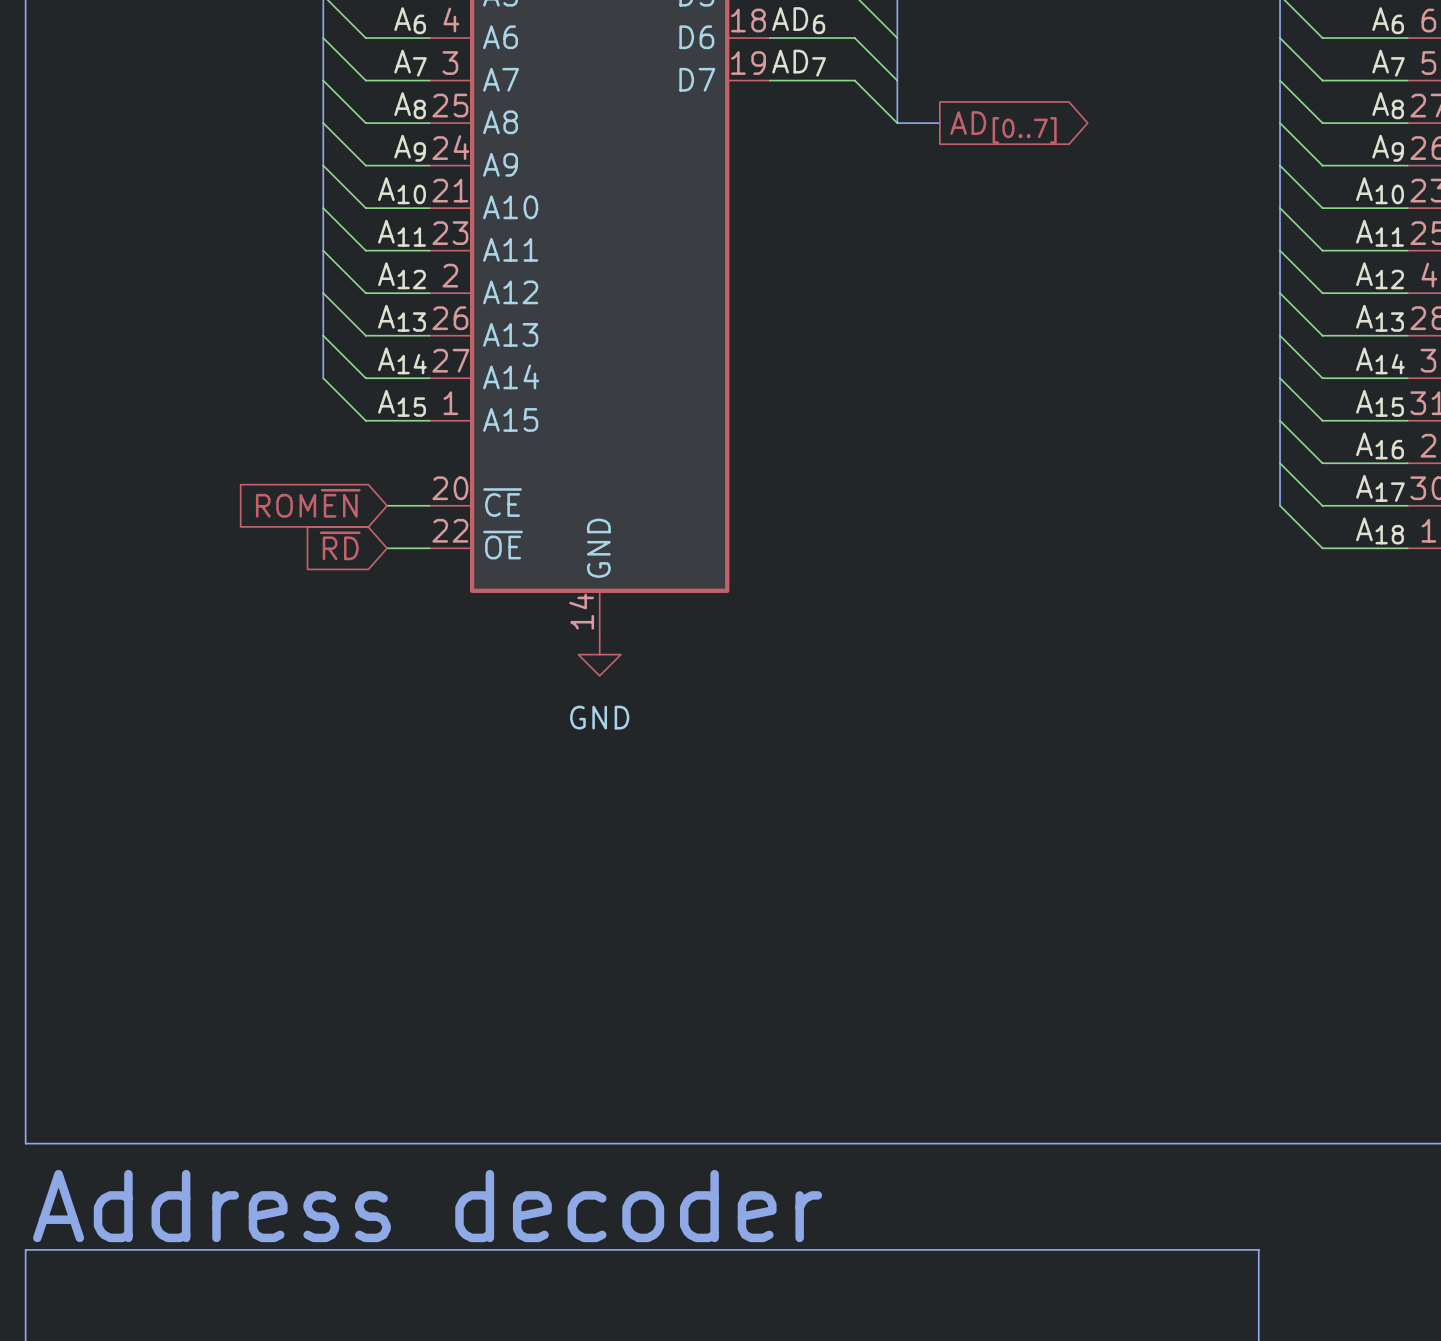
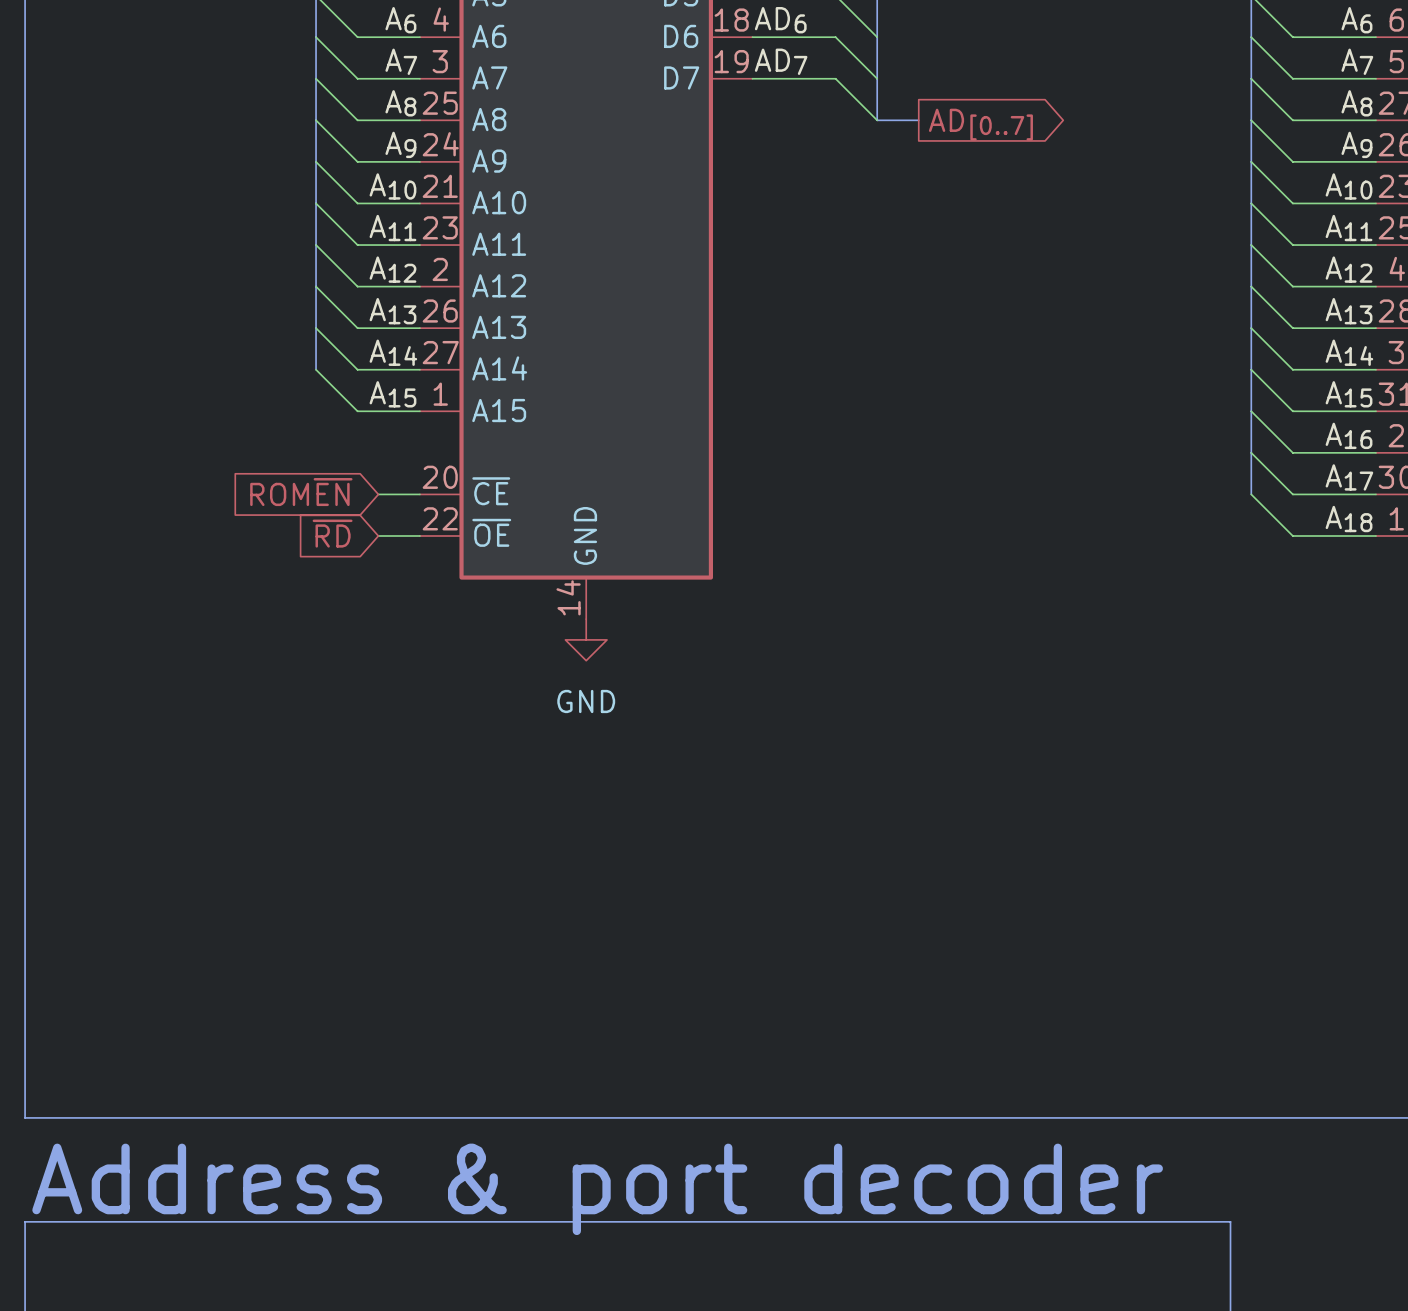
text: Address decoder (427, 1206) -> Address & port decoder (597, 1189)

